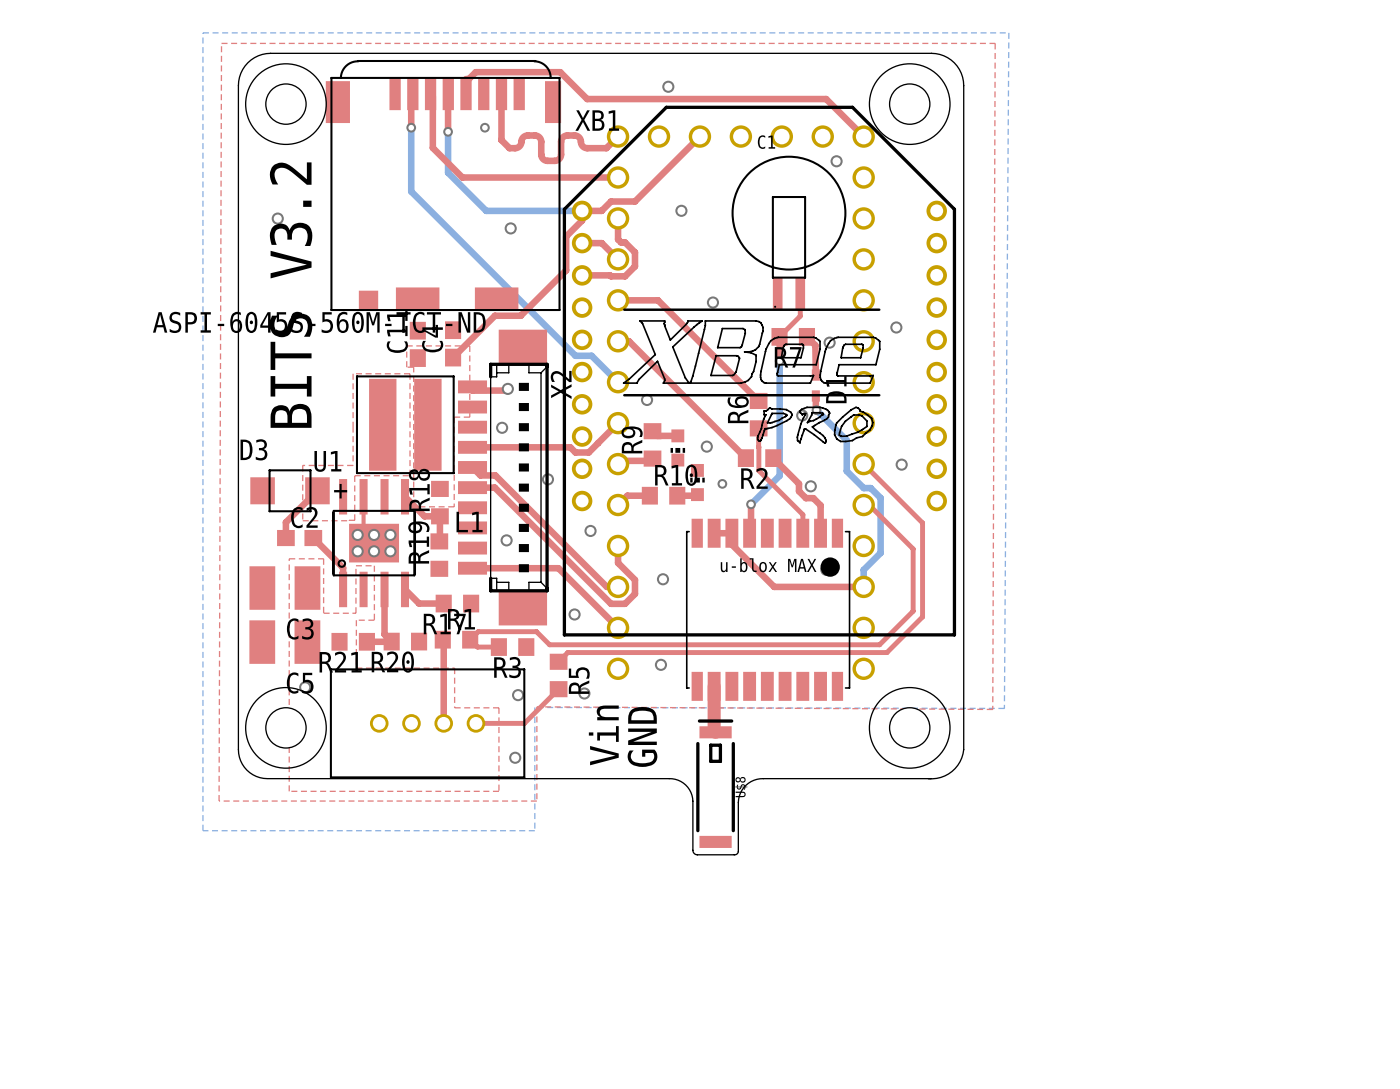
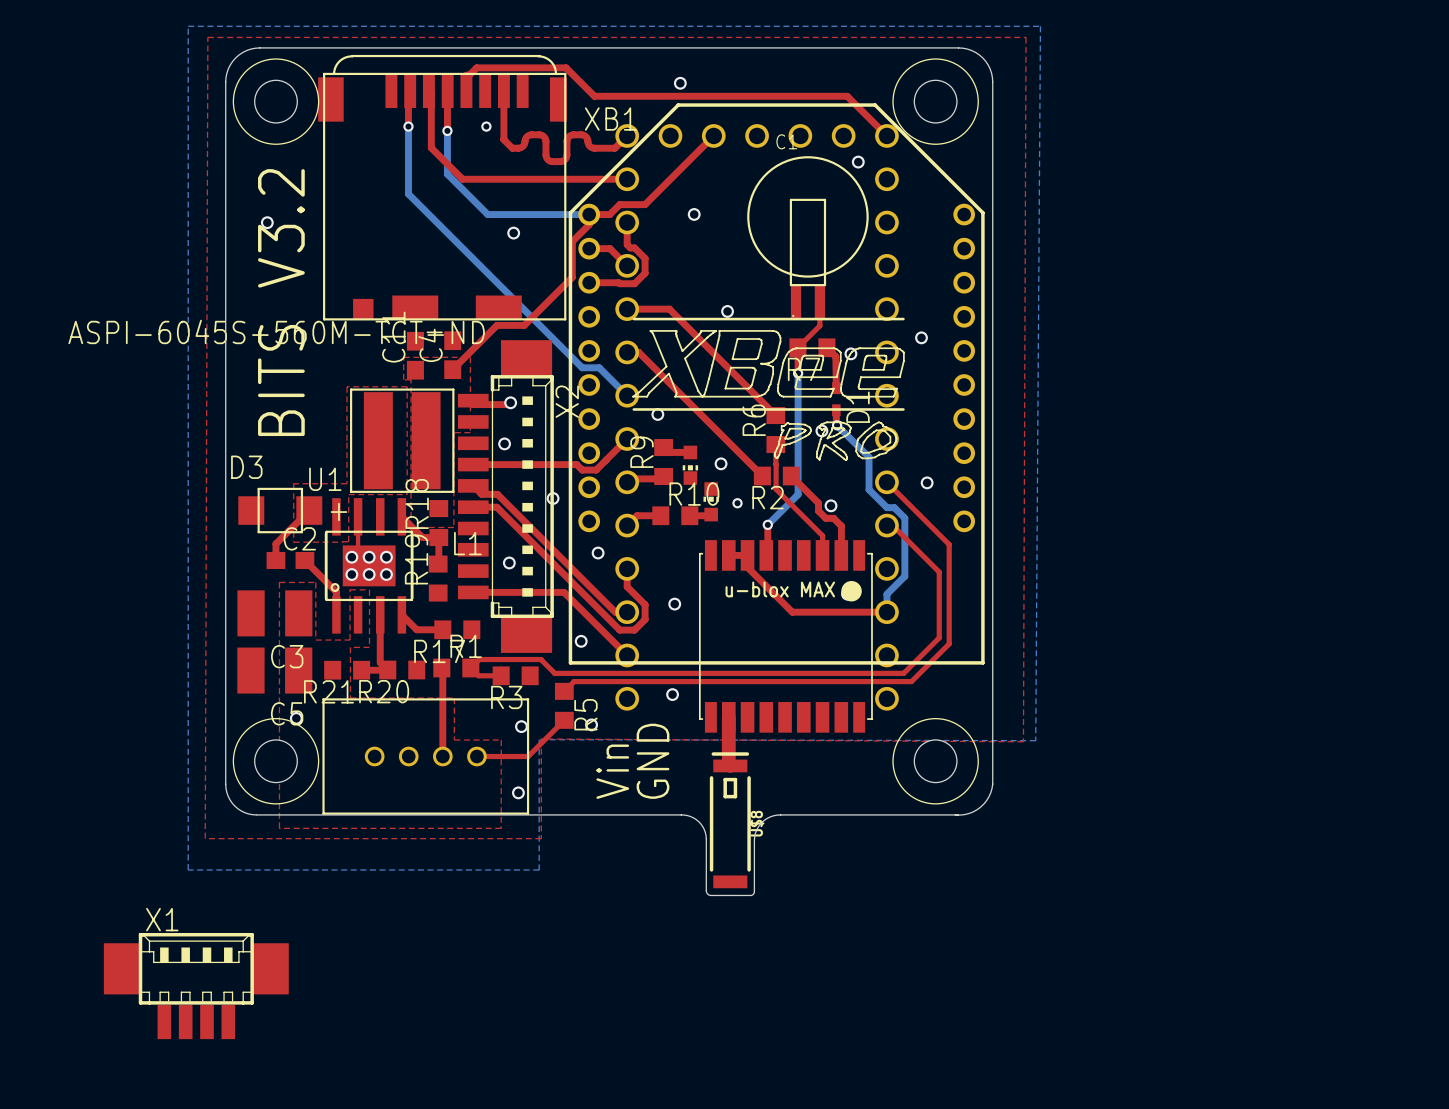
X1: none -> (196, 986)

